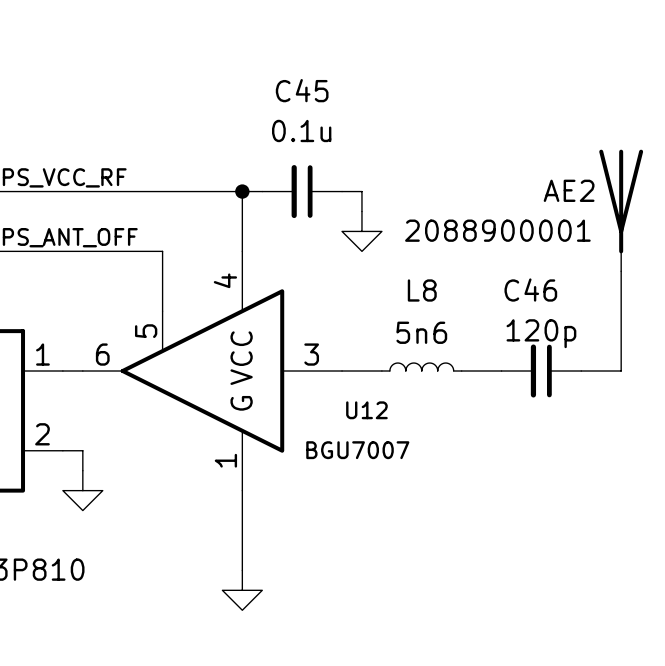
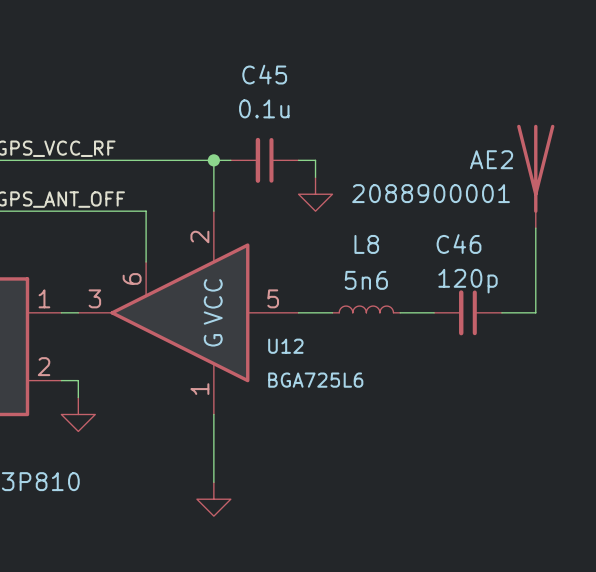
U12 pin number: 4 (225, 280) -> 2 (199, 236)
U12 pin number: 5 (146, 331) -> 6 (132, 278)
U12 pin number: 6 (102, 354) -> 3 (94, 298)
U12 pin number: 3 (311, 354) -> 5 (273, 298)
U12 name position: U12 (366, 410) -> U12 (285, 346)
U12 value: BGU7007 (357, 450) -> BGA725L6 (315, 380)

